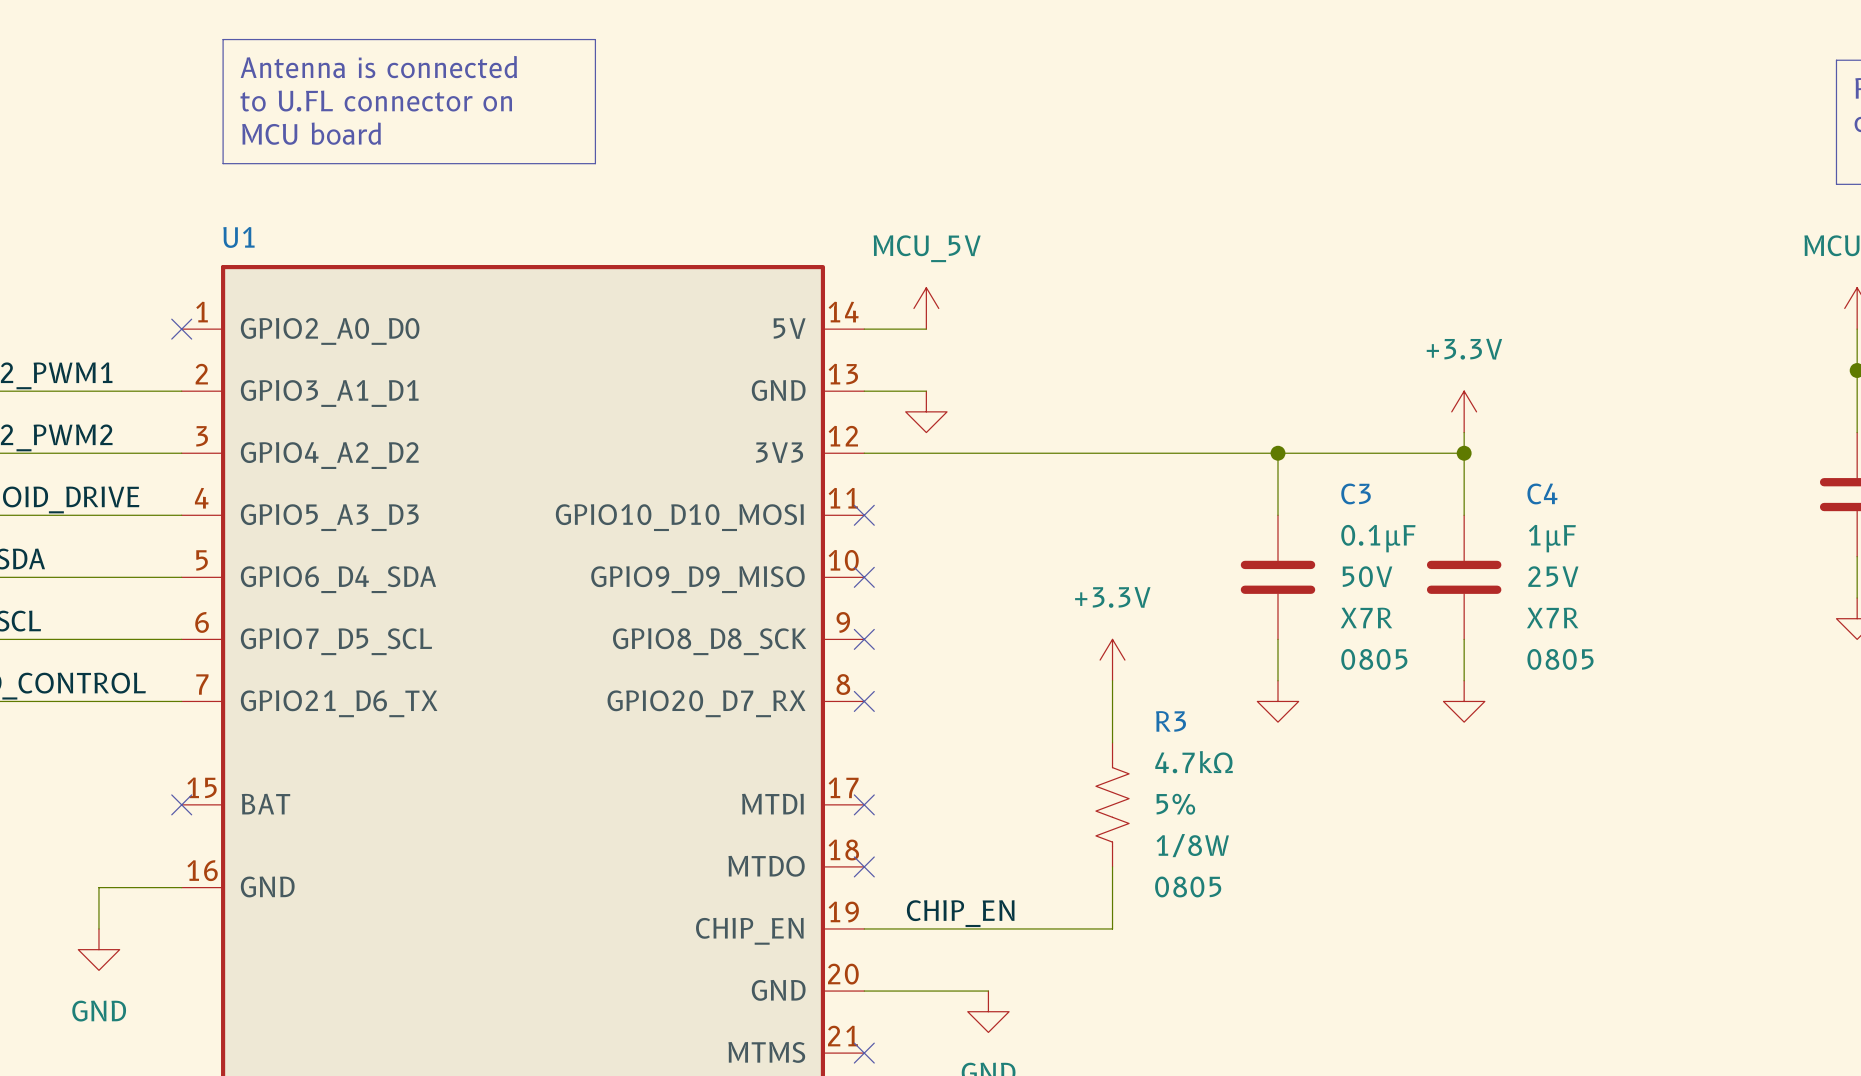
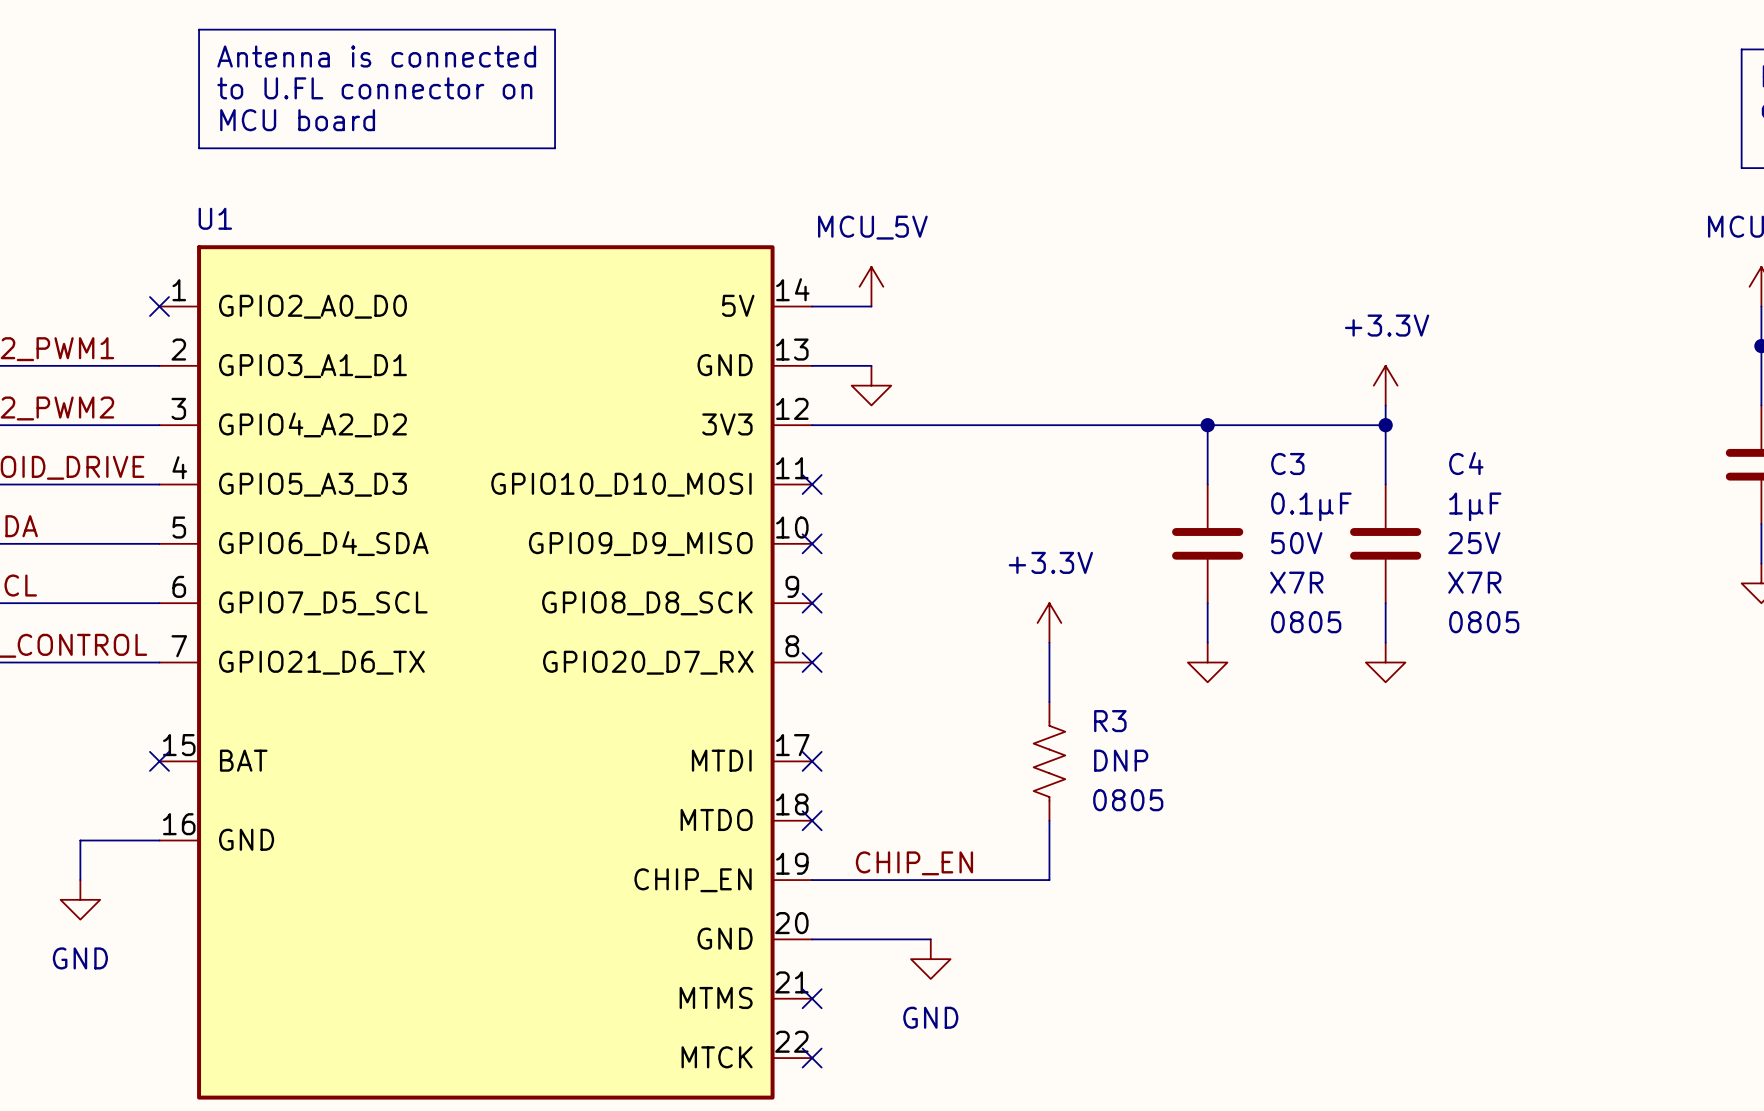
R3 name position: R3 (1170, 721) -> R3 (1110, 721)
R3 text: 4.7kΩ (1194, 762) -> DNP (1121, 760)
R3 text: 5% (1175, 804) -> none
R3 text: 1/8W (1192, 845) -> none
R3 text position: 0805 (1188, 886) -> 0805 (1128, 800)

